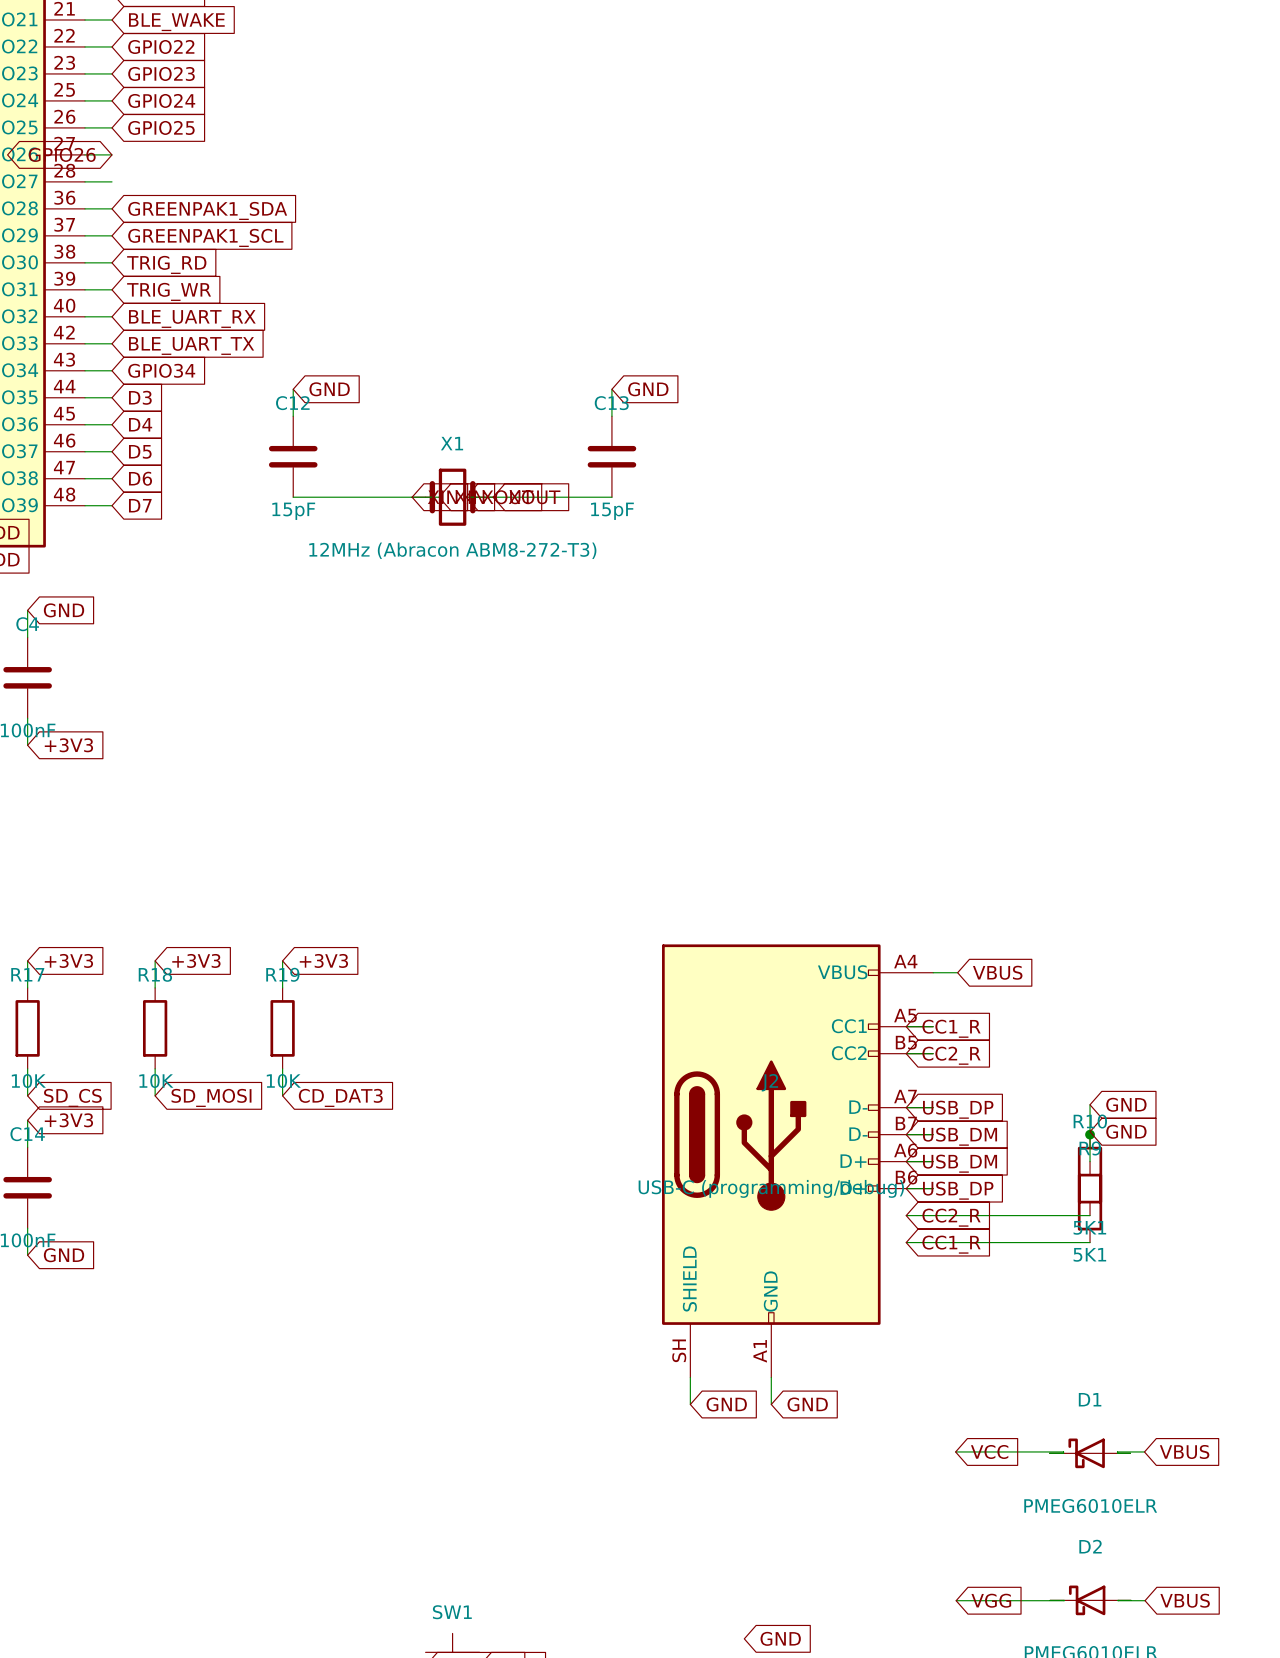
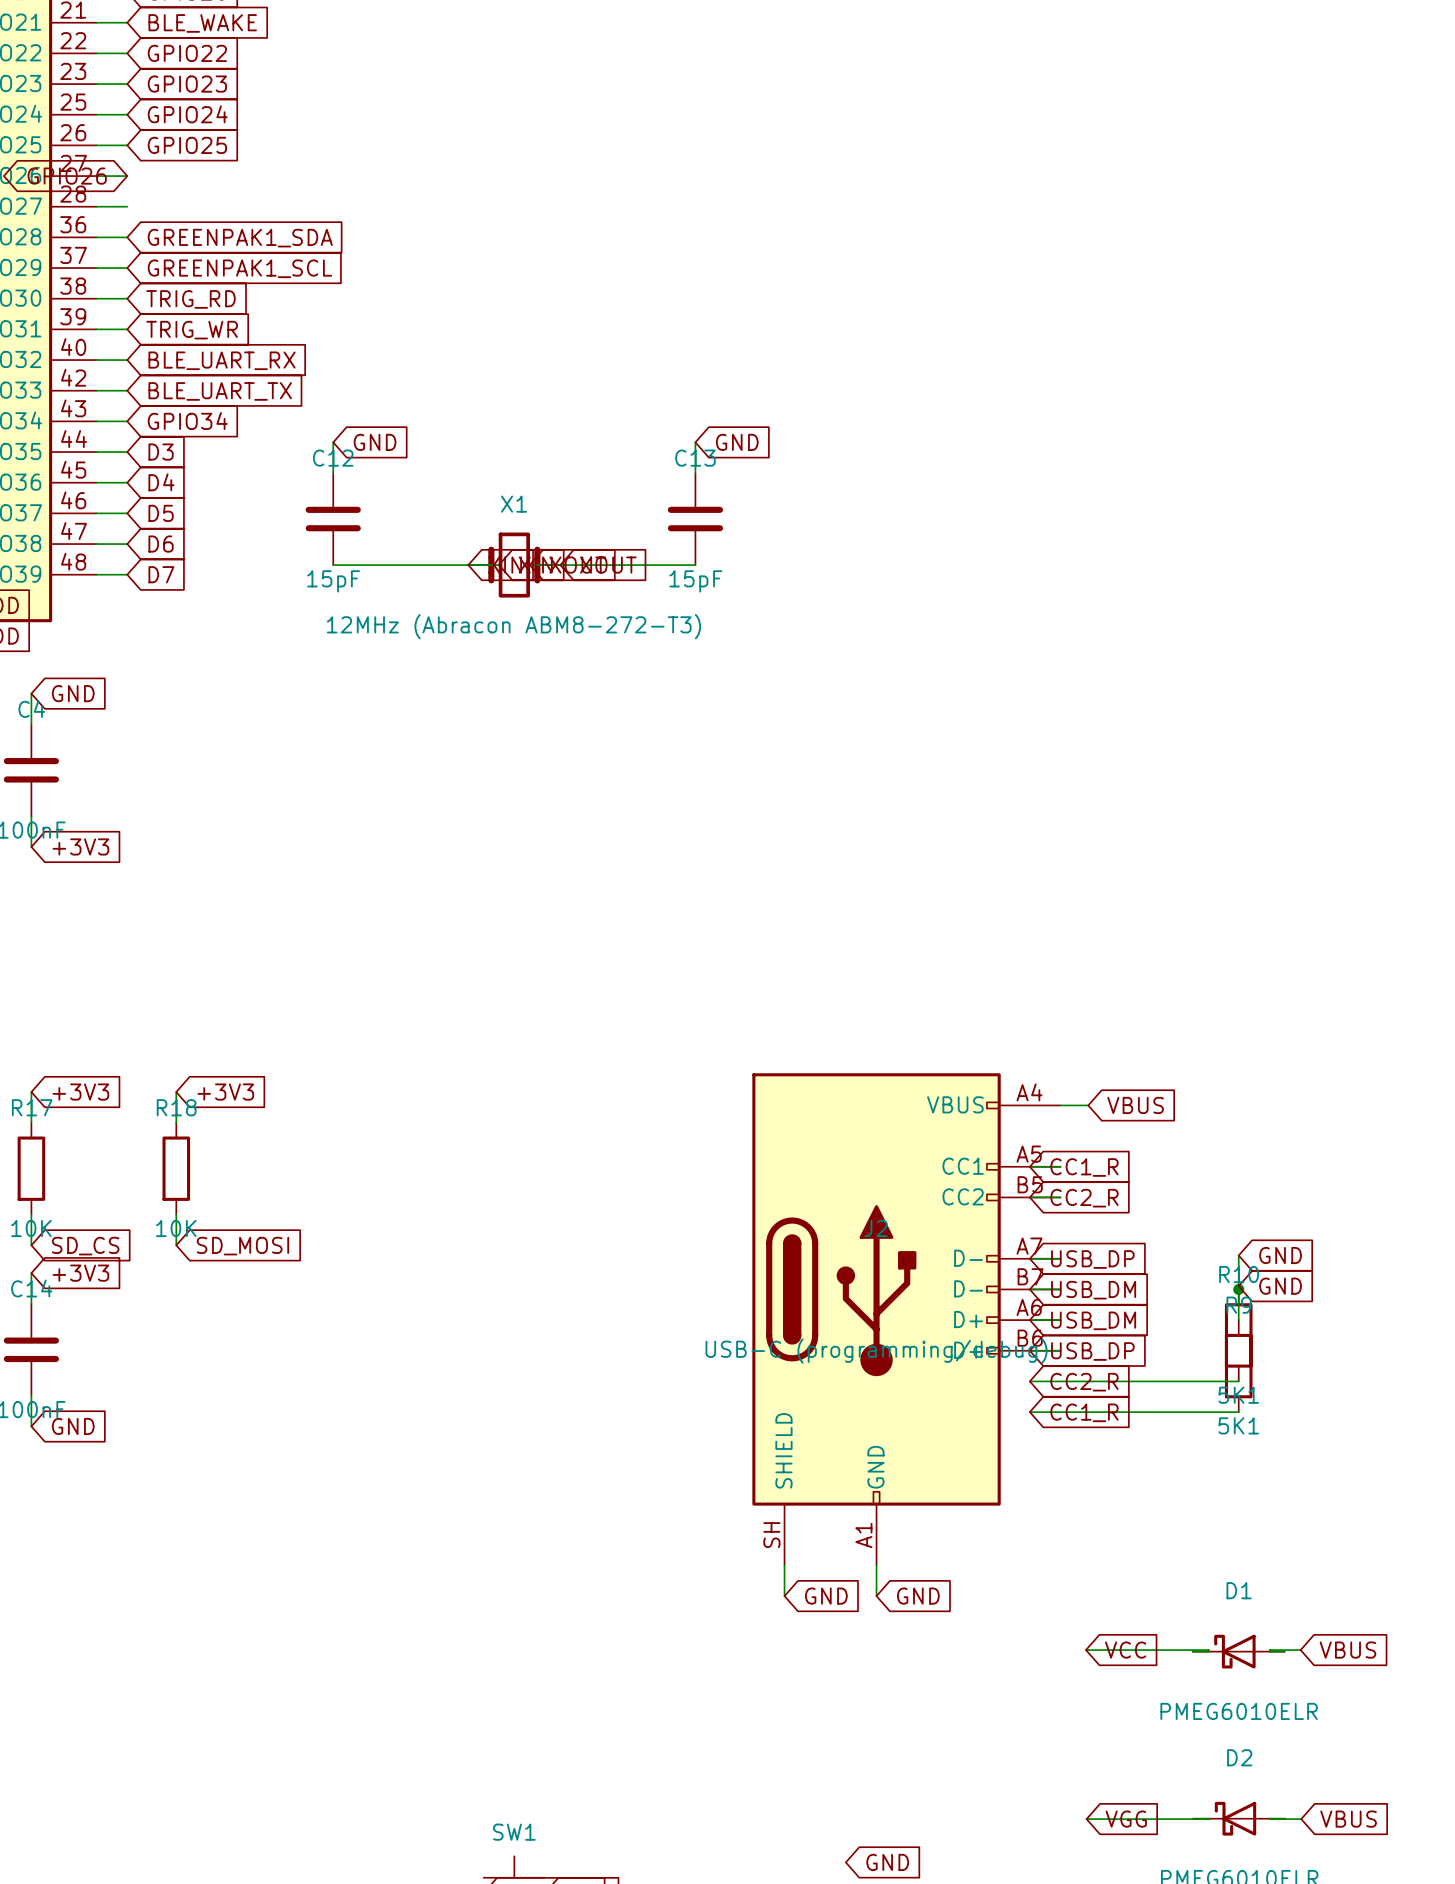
wire: (282, 960) (282, 987) -> none
global label: +3V3 (323, 960) -> none
R19: 10K (282, 1028) -> none
wire: (282, 1068) (282, 1095) -> none
global label: CD_DAT3 (340, 1097) -> none

